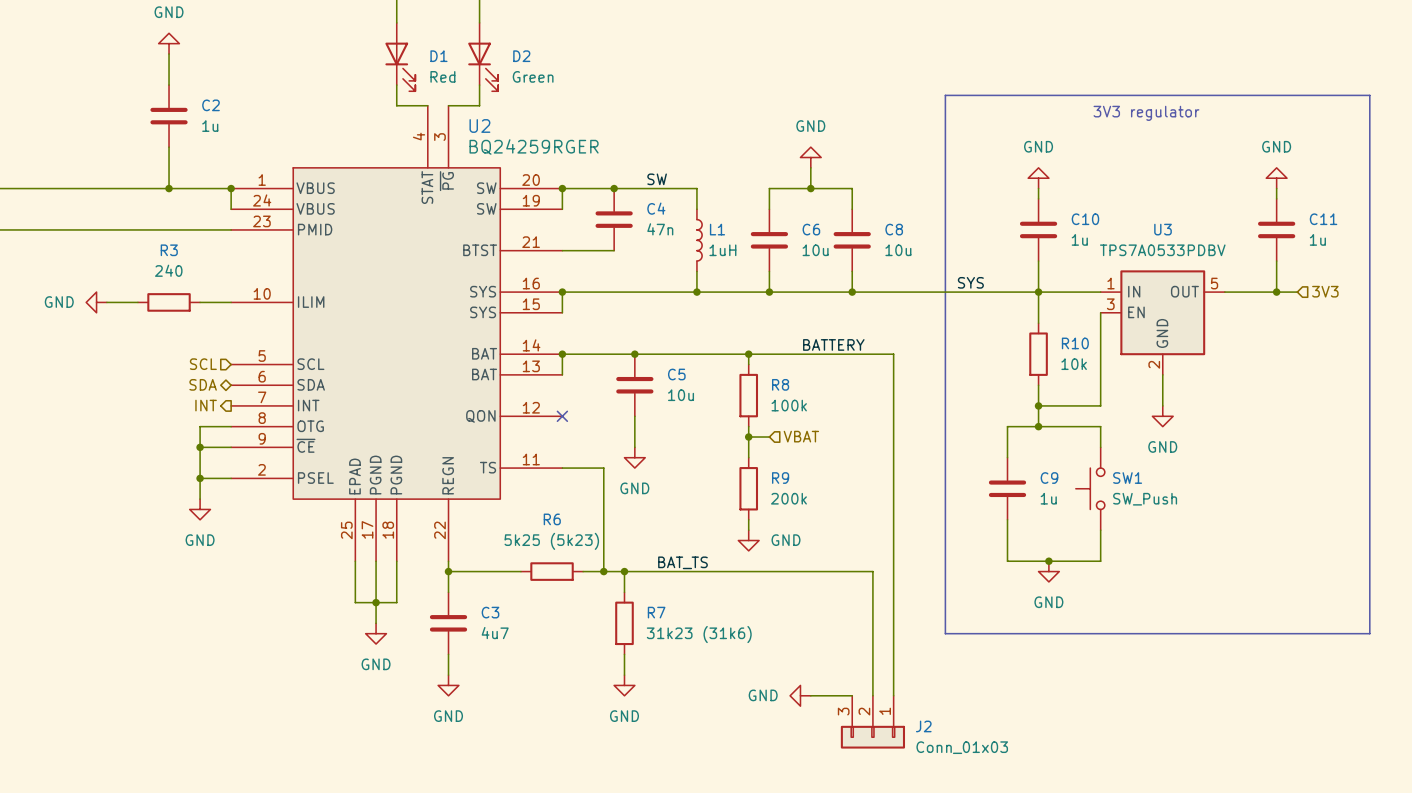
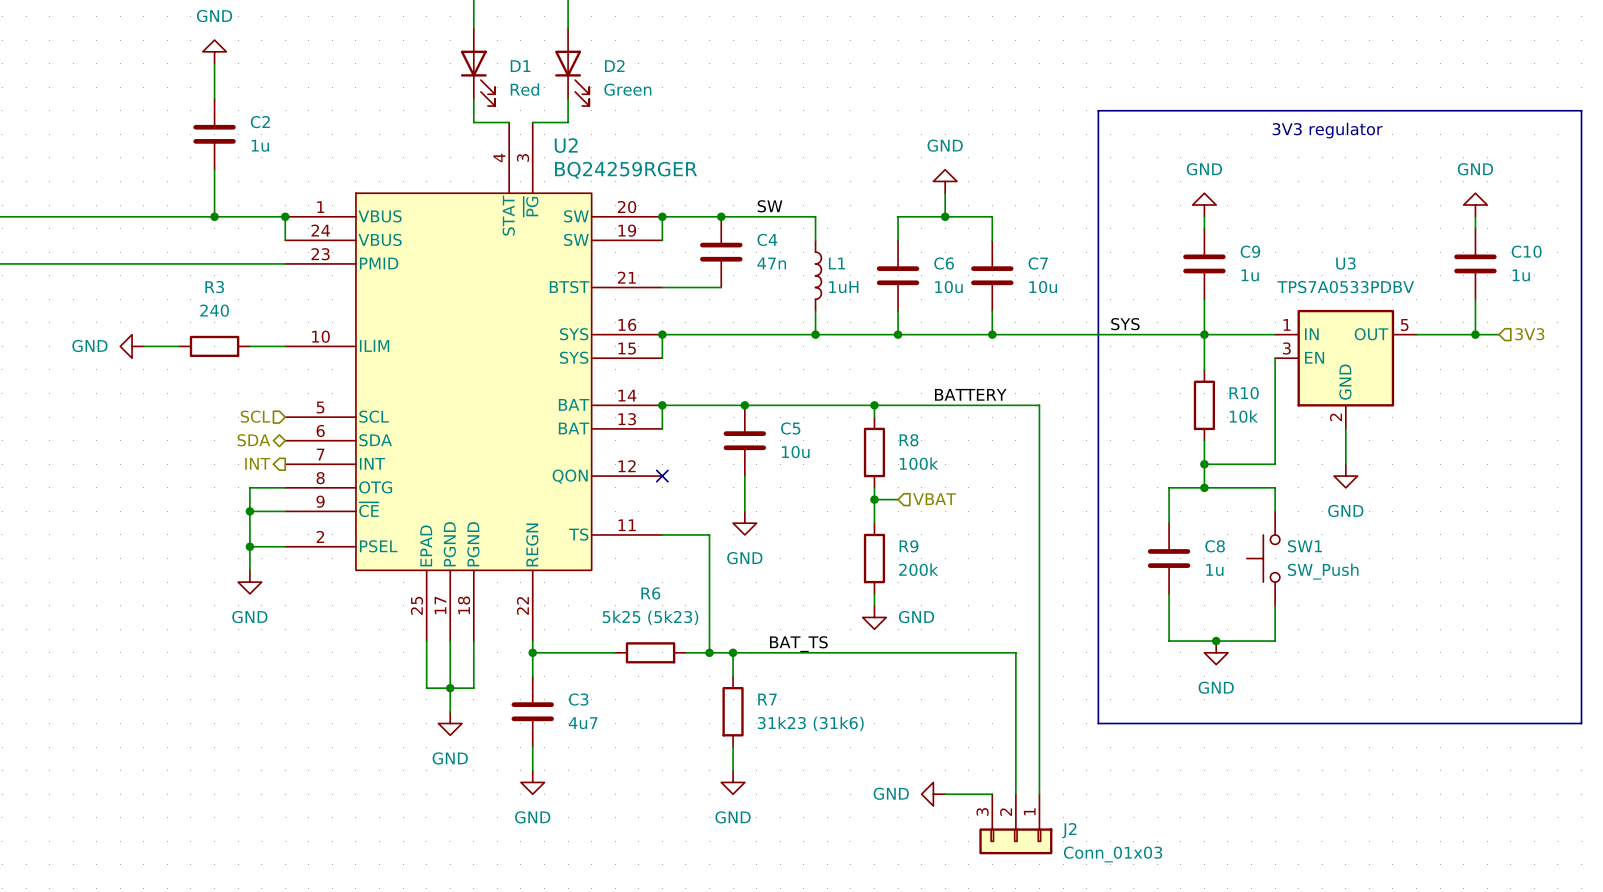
C10 name: C10 (1085, 219) -> C9 (1250, 251)
C11 name: C11 (1323, 219) -> C10 (1526, 251)
C8 name: C8 (894, 229) -> C7 (1038, 263)
C9 name: C9 (1049, 478) -> C8 (1215, 546)

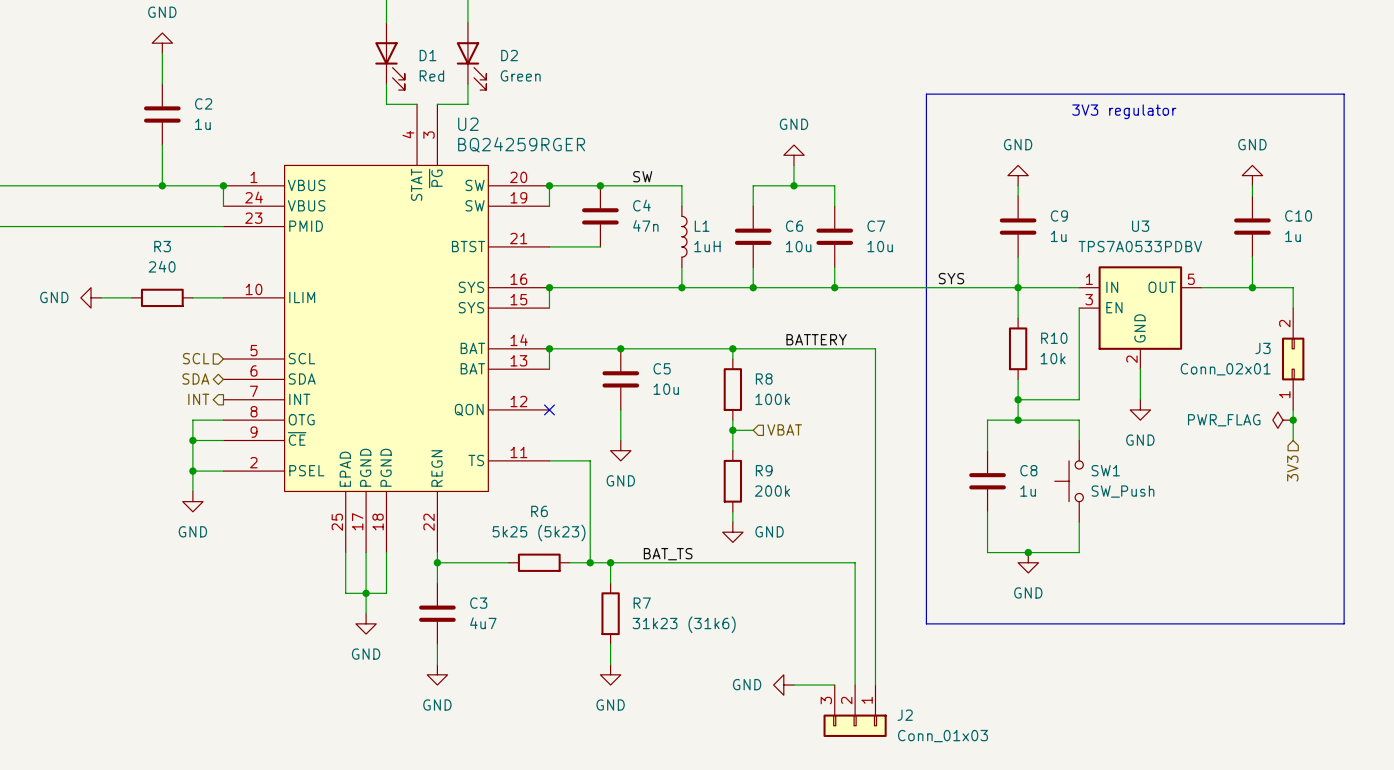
wire: none -> (1272, 287) (1293, 287) (1293, 308)
hierarchical label rotation: 0° (1529, 334) -> 90° clockwise (1292, 468)
hierarchical label position: 3V3 (1529, 334) -> 3V3 (1292, 468)
J3: none -> Conn_02x01 (1293, 359)
wire: none -> (1293, 409) (1293, 440)
power symbol: none -> PWR_FLAG (1282, 420)
junction: none -> (1293, 420)

